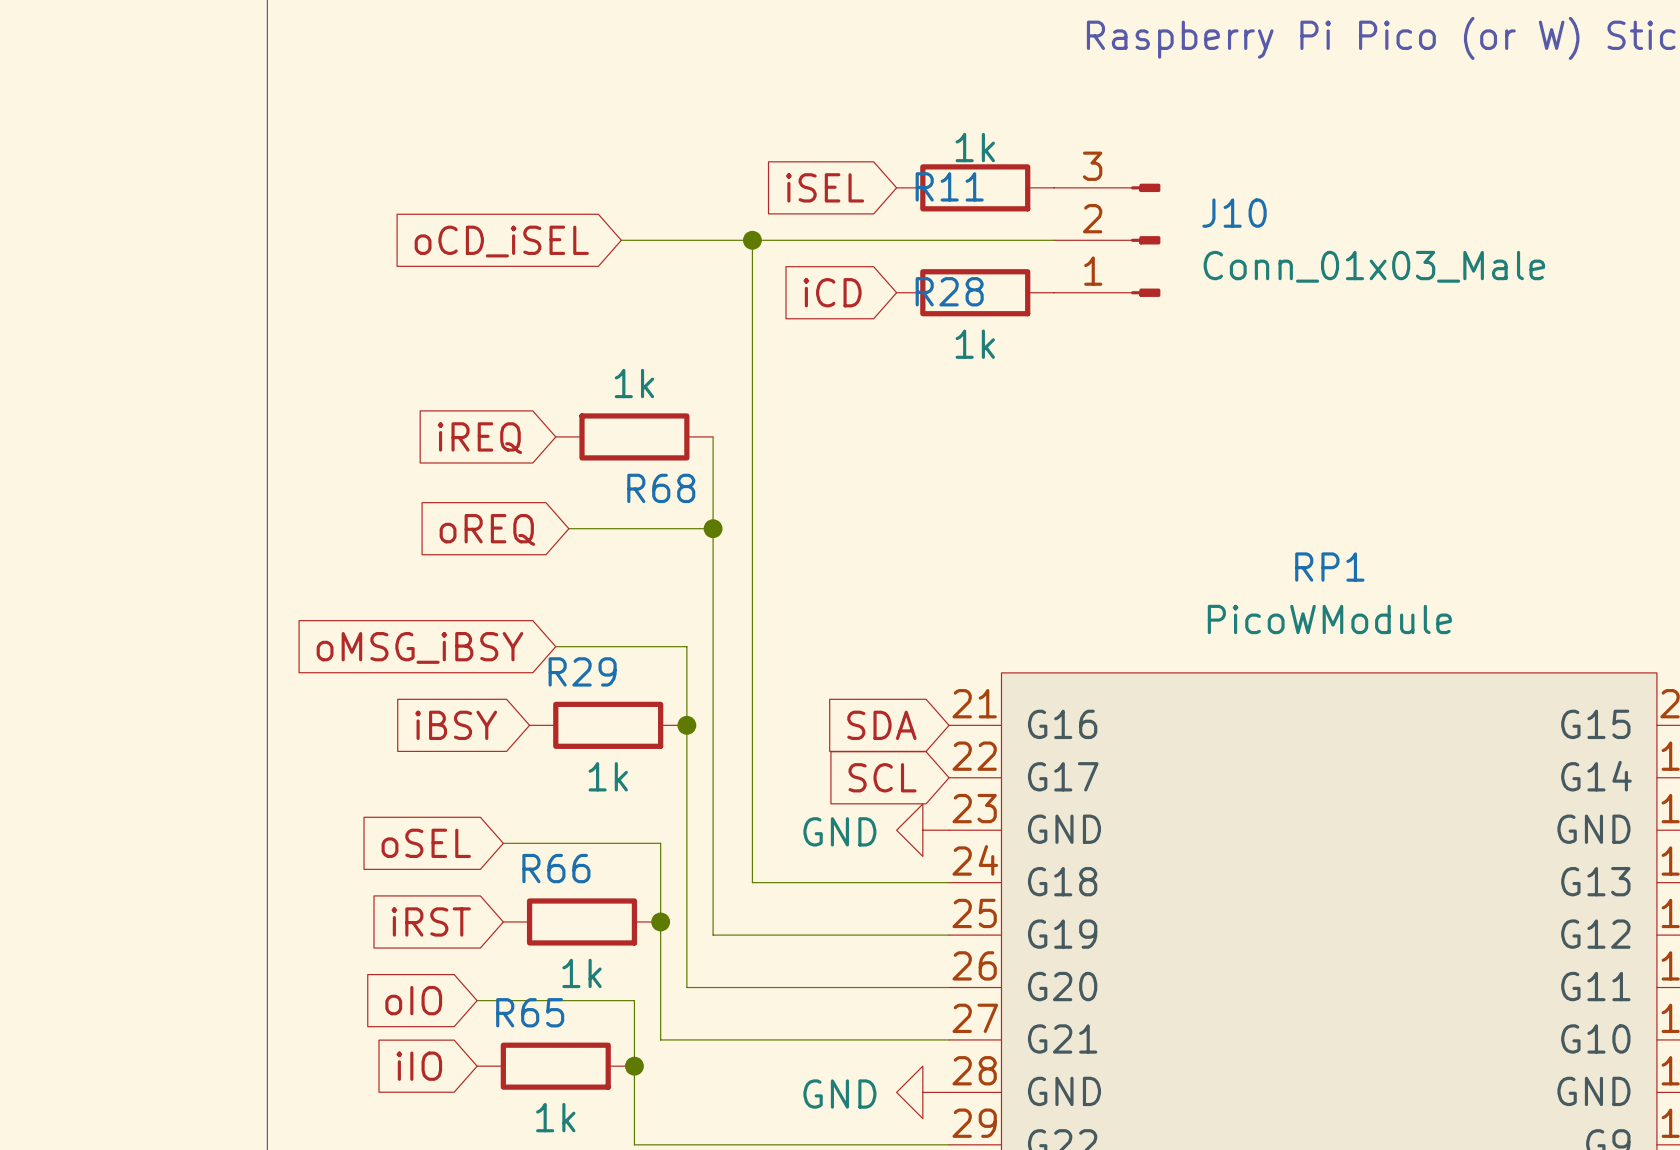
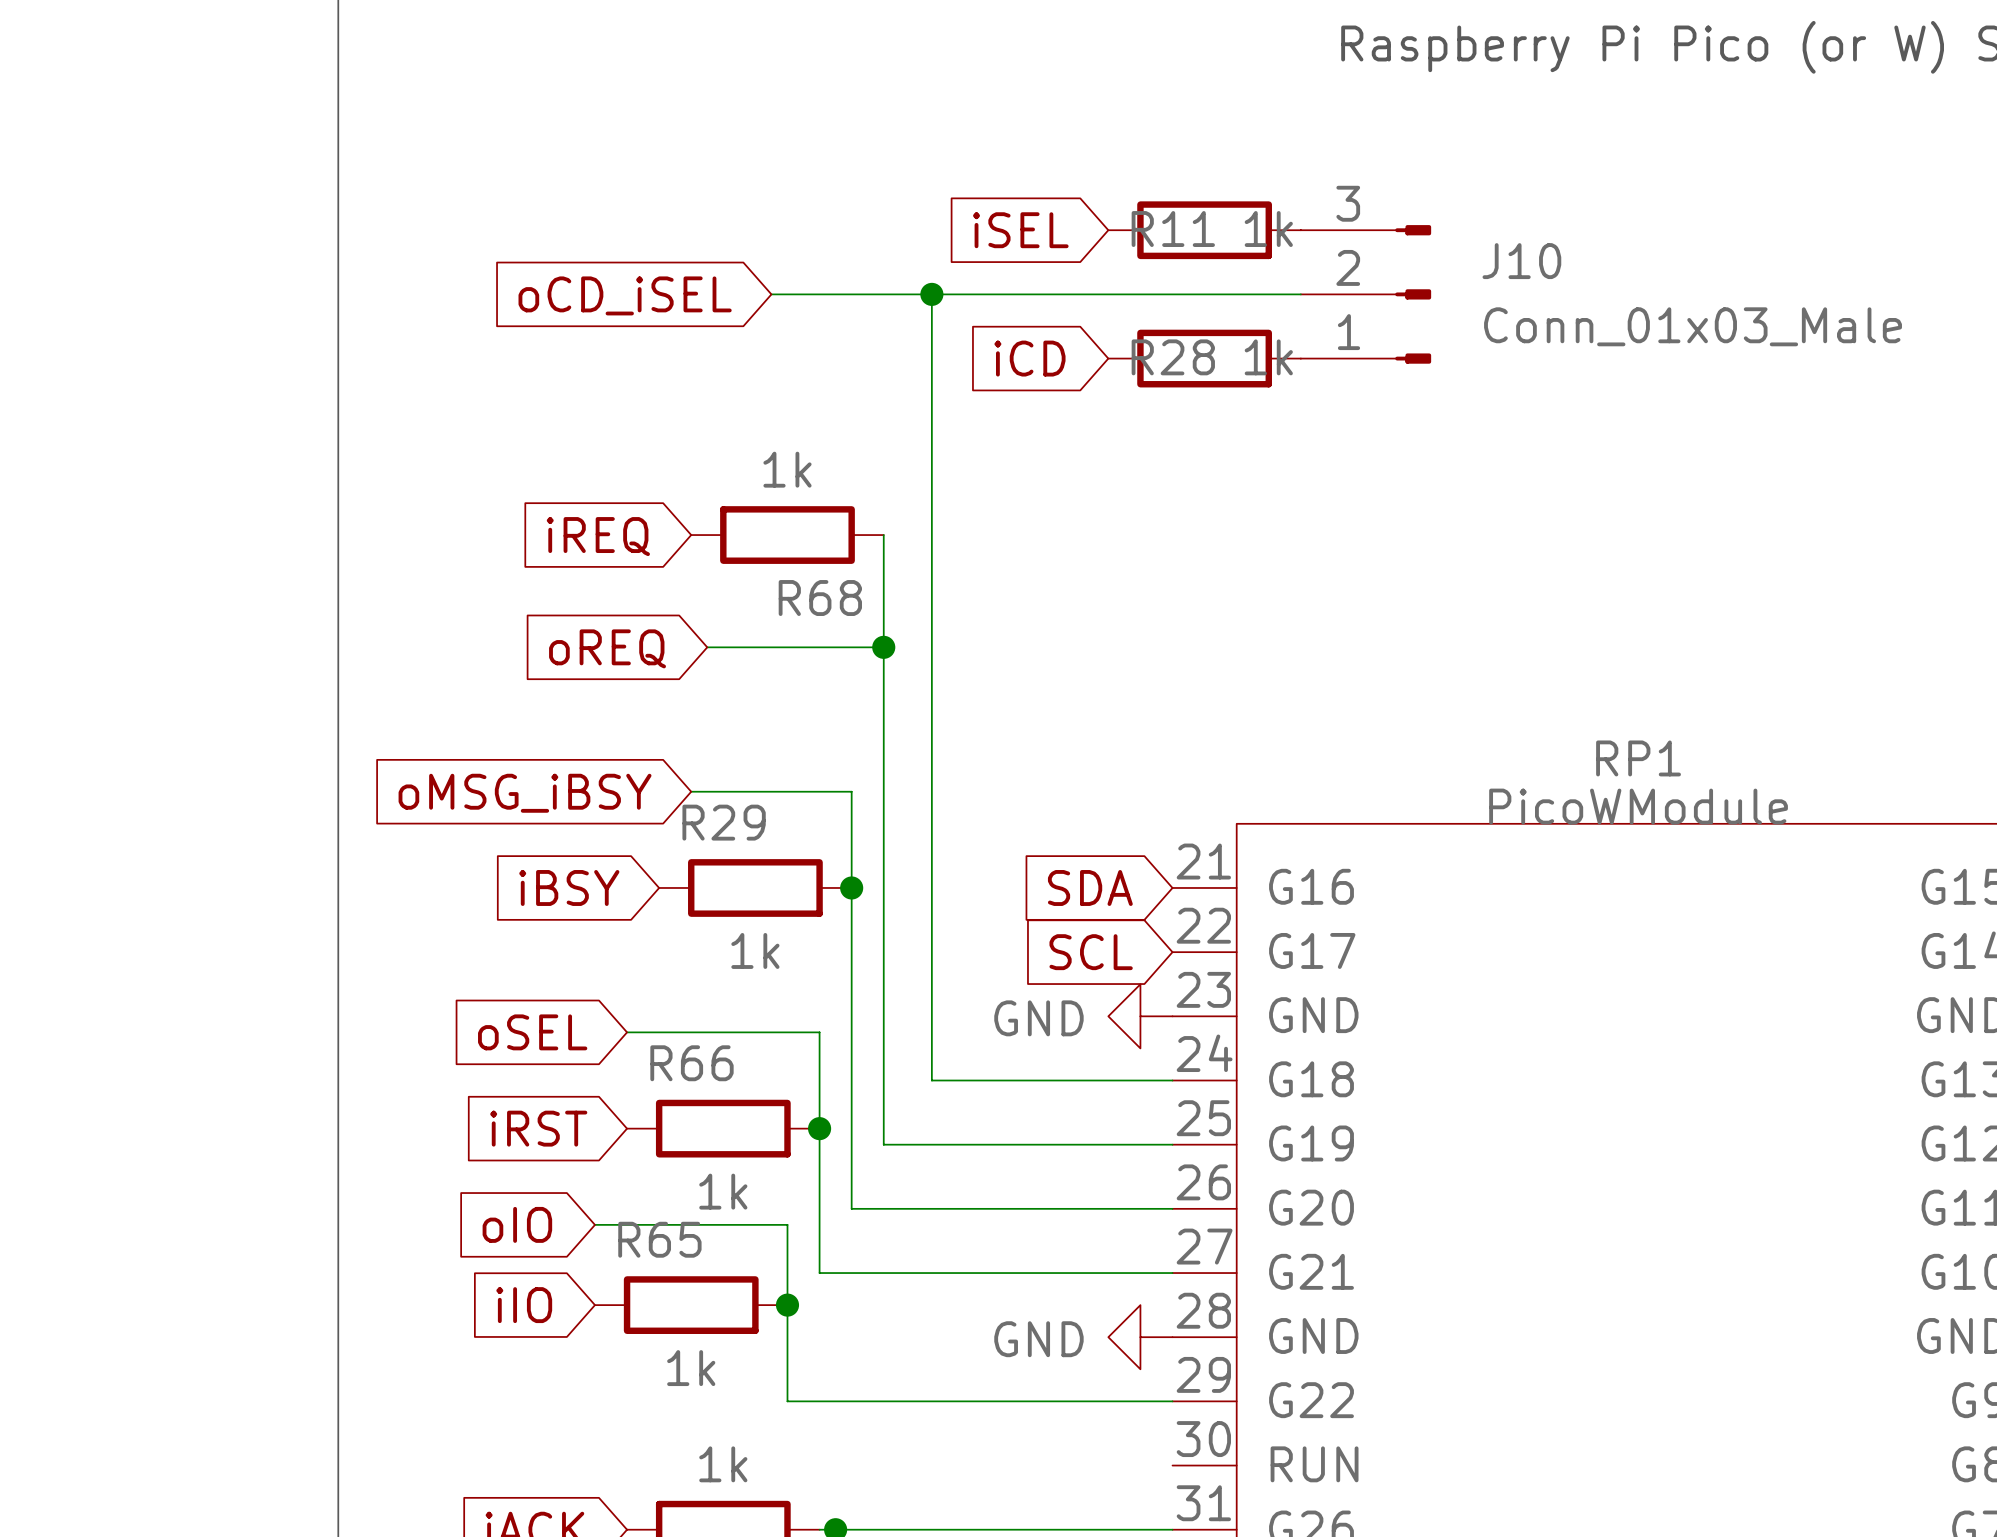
R11 value position: 1k (975, 147) -> 1k (1268, 229)
R28 value position: 1k (975, 344) -> 1k (1268, 357)
RP1 name position: RP1 (1329, 567) -> RP1 (1638, 758)
RP1 value position: PicoWModule (1329, 619) -> PicoWModule (1638, 806)

